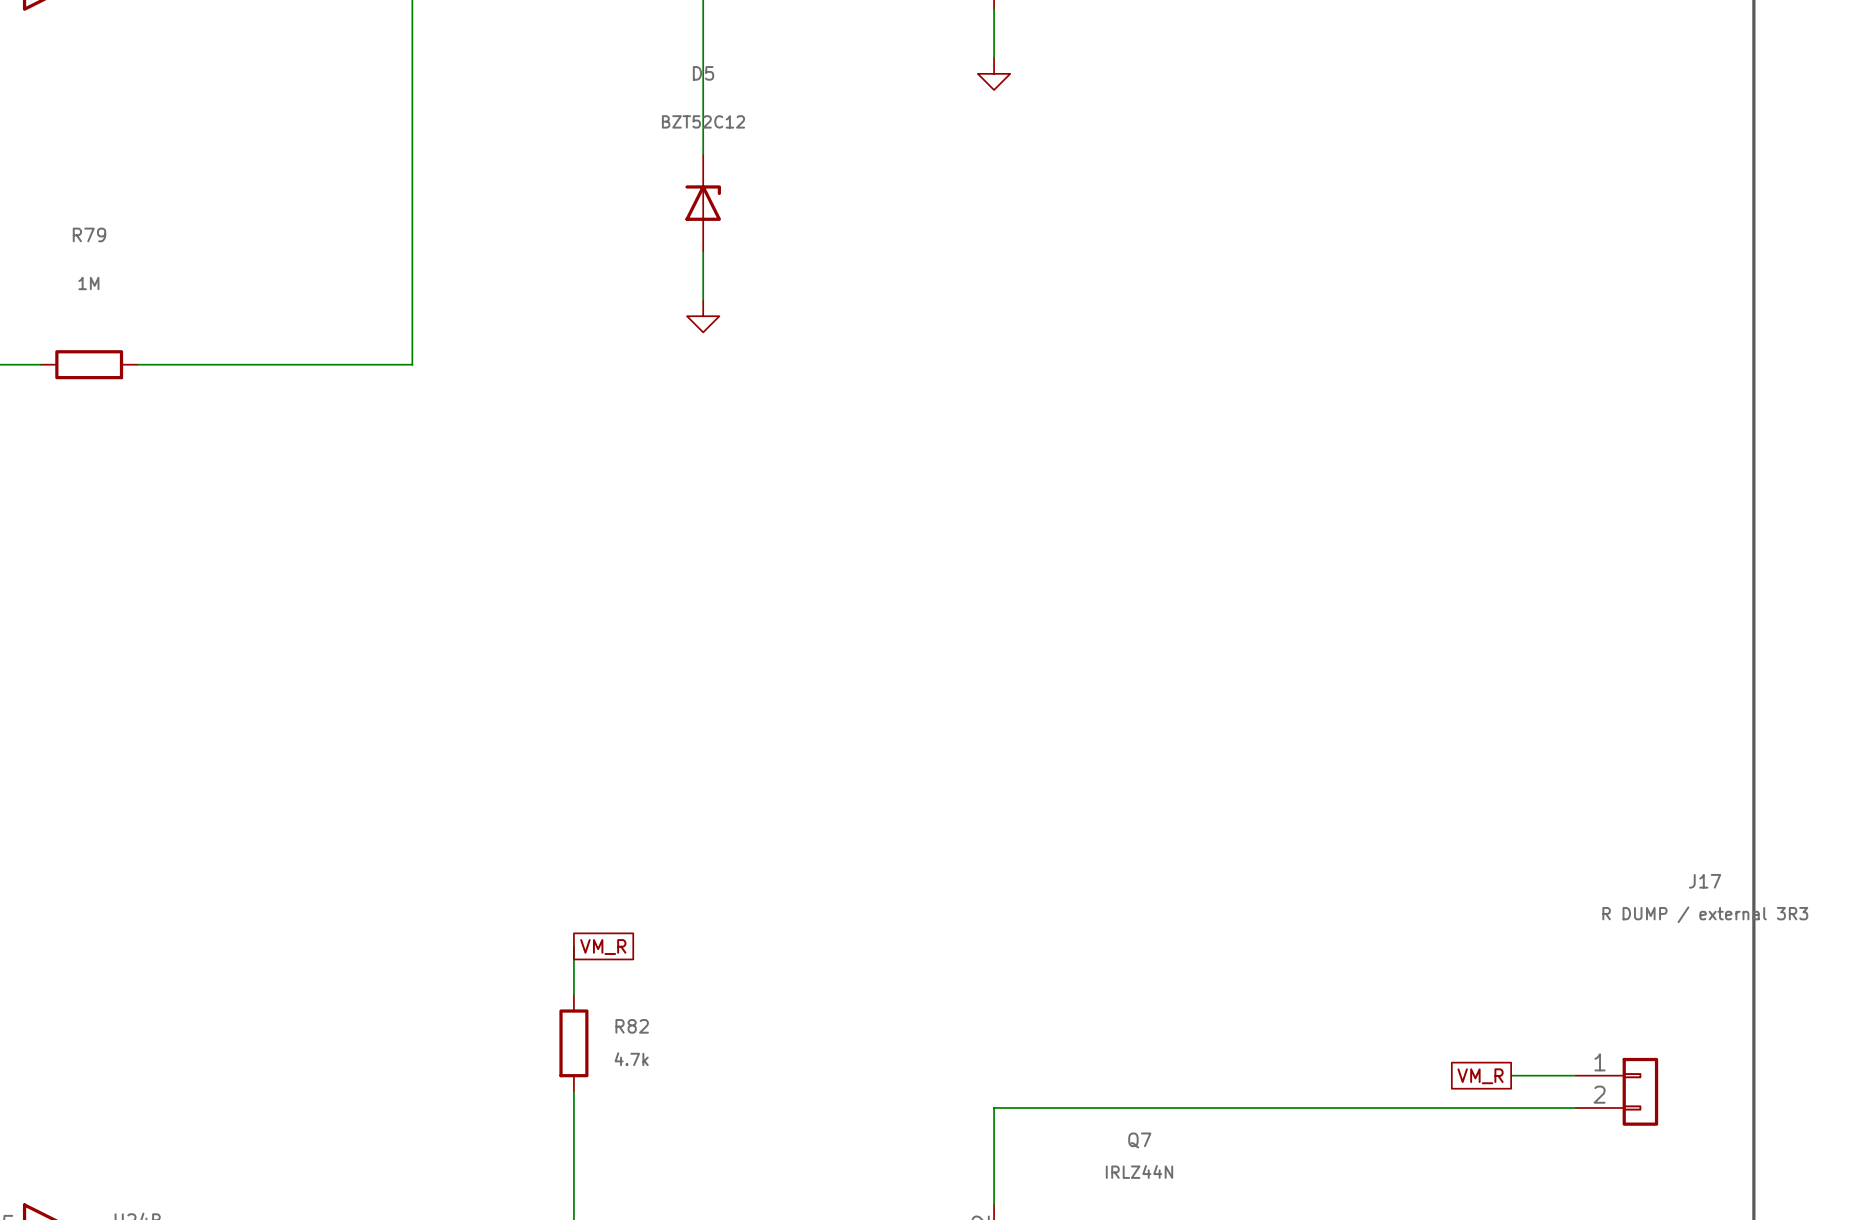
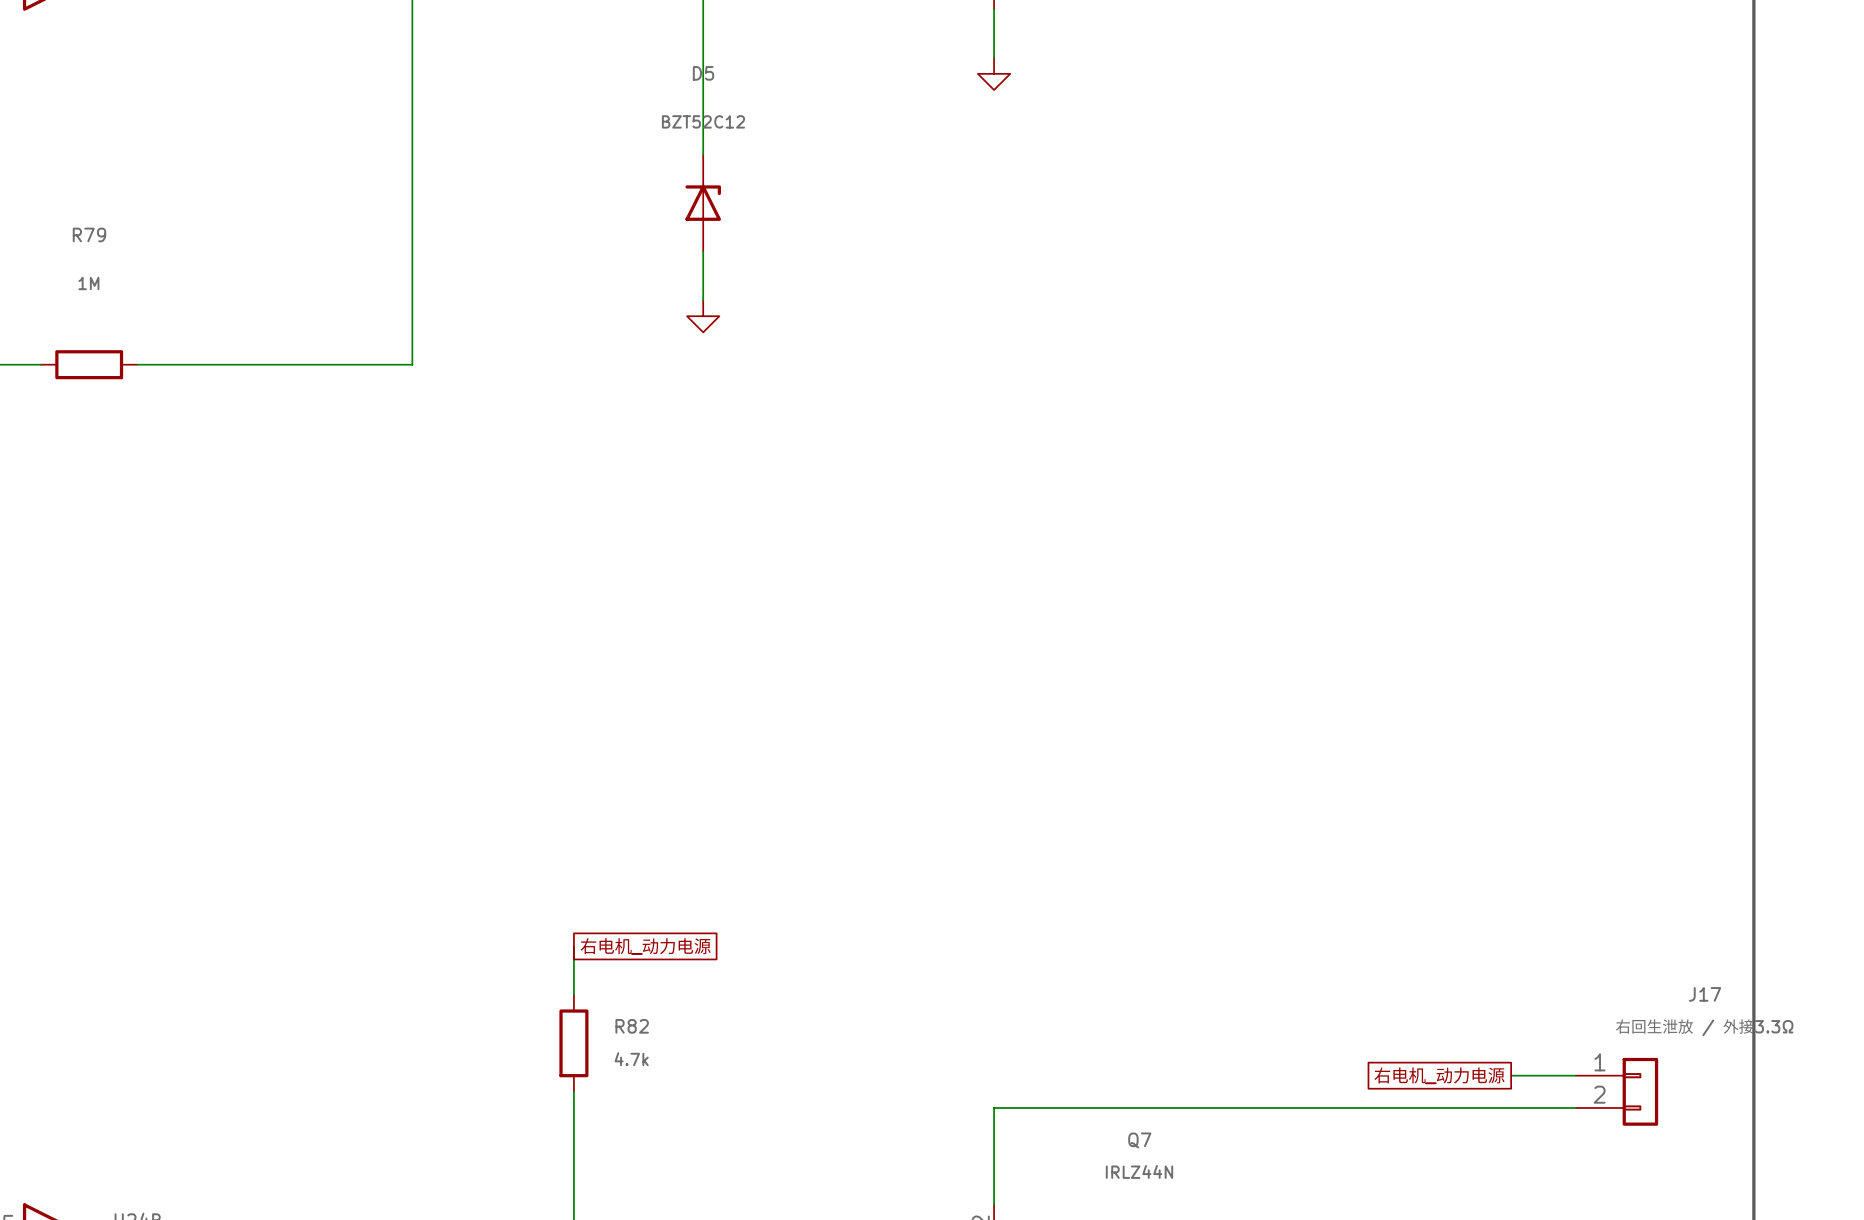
J17 name position: J17 (1705, 881) -> J17 (1705, 994)
J17 value: R DUMP / external 3R3 (1705, 914) -> 右回生泄放 / 外接3.3Ω (1704, 1027)
global label: VM_R (603, 947) -> 右电机_动力电源 (645, 946)
global label: VM_R (1480, 1076) -> 右电机_动力电源 (1439, 1075)

